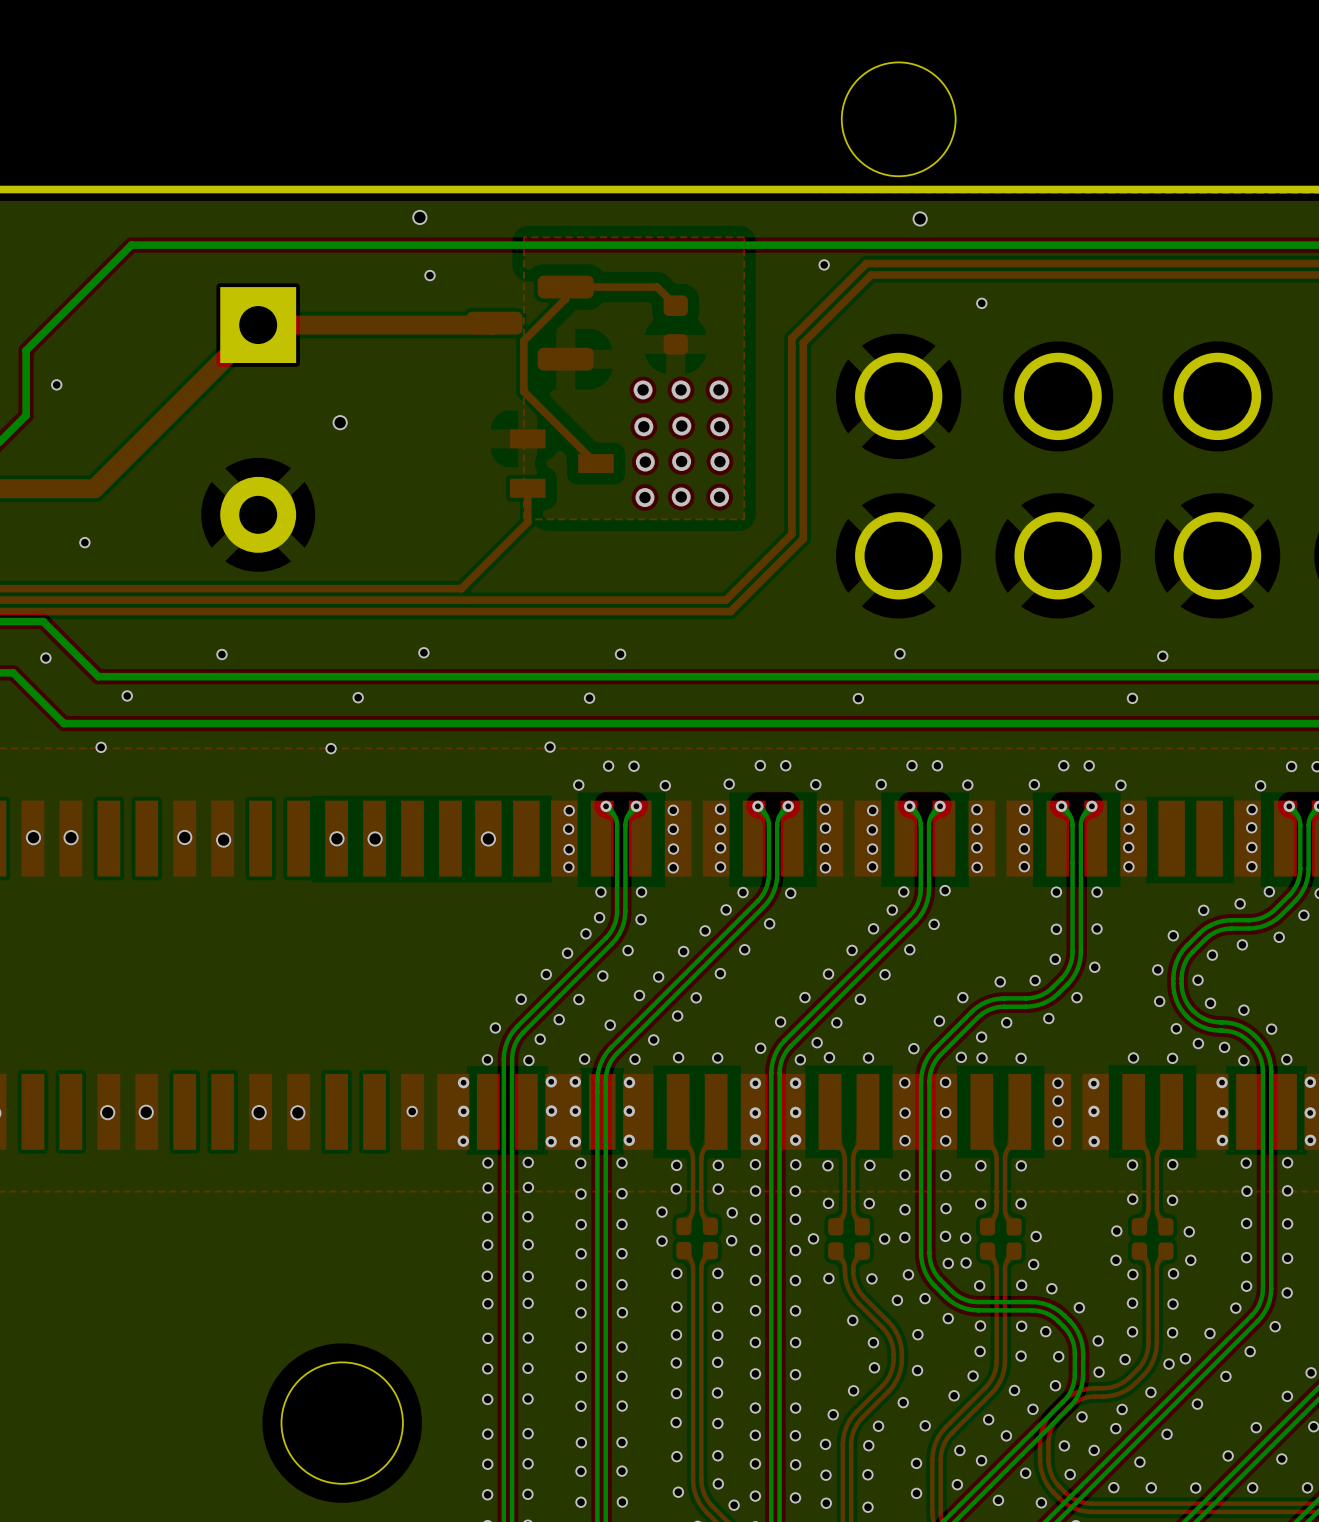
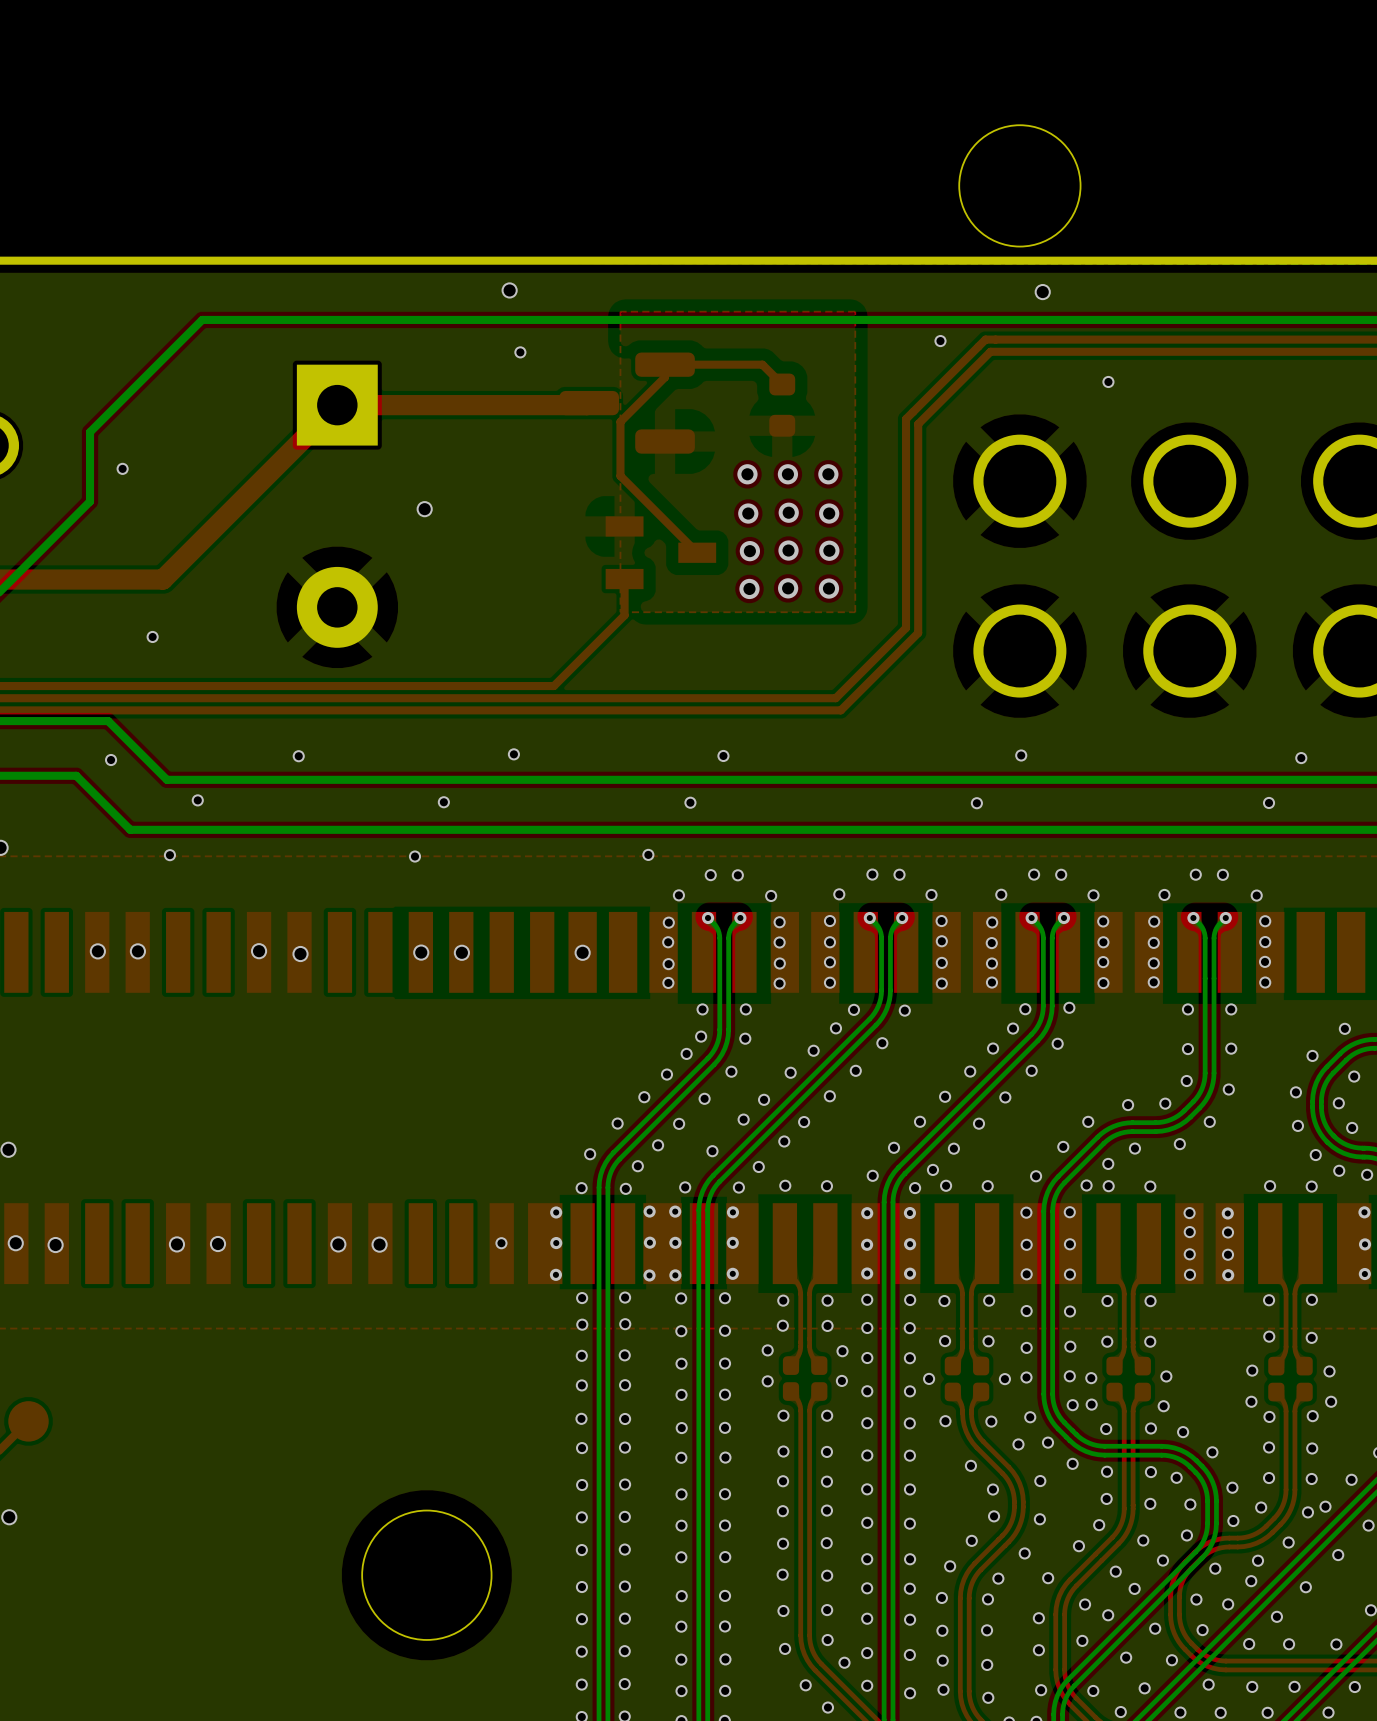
via: none -> (1227, 1232)
via: (1093, 1111) -> none
via: none -> (1227, 1254)

